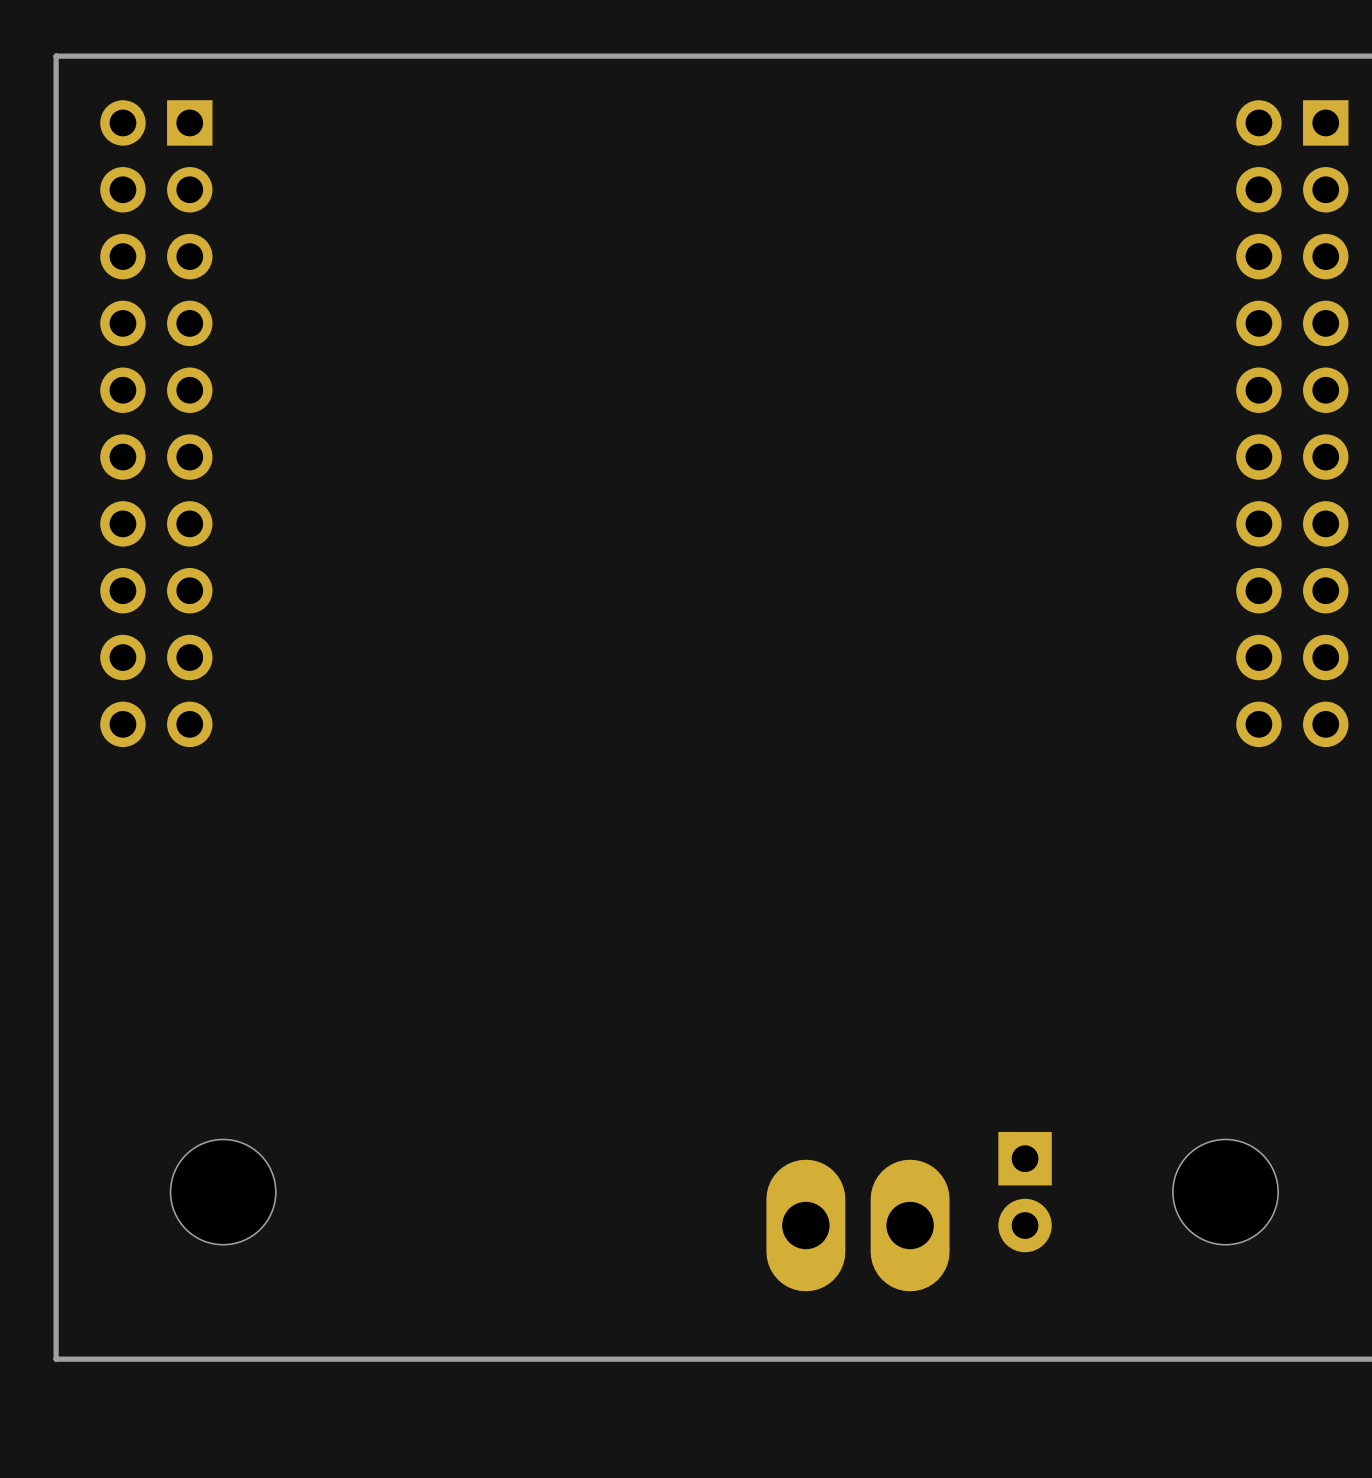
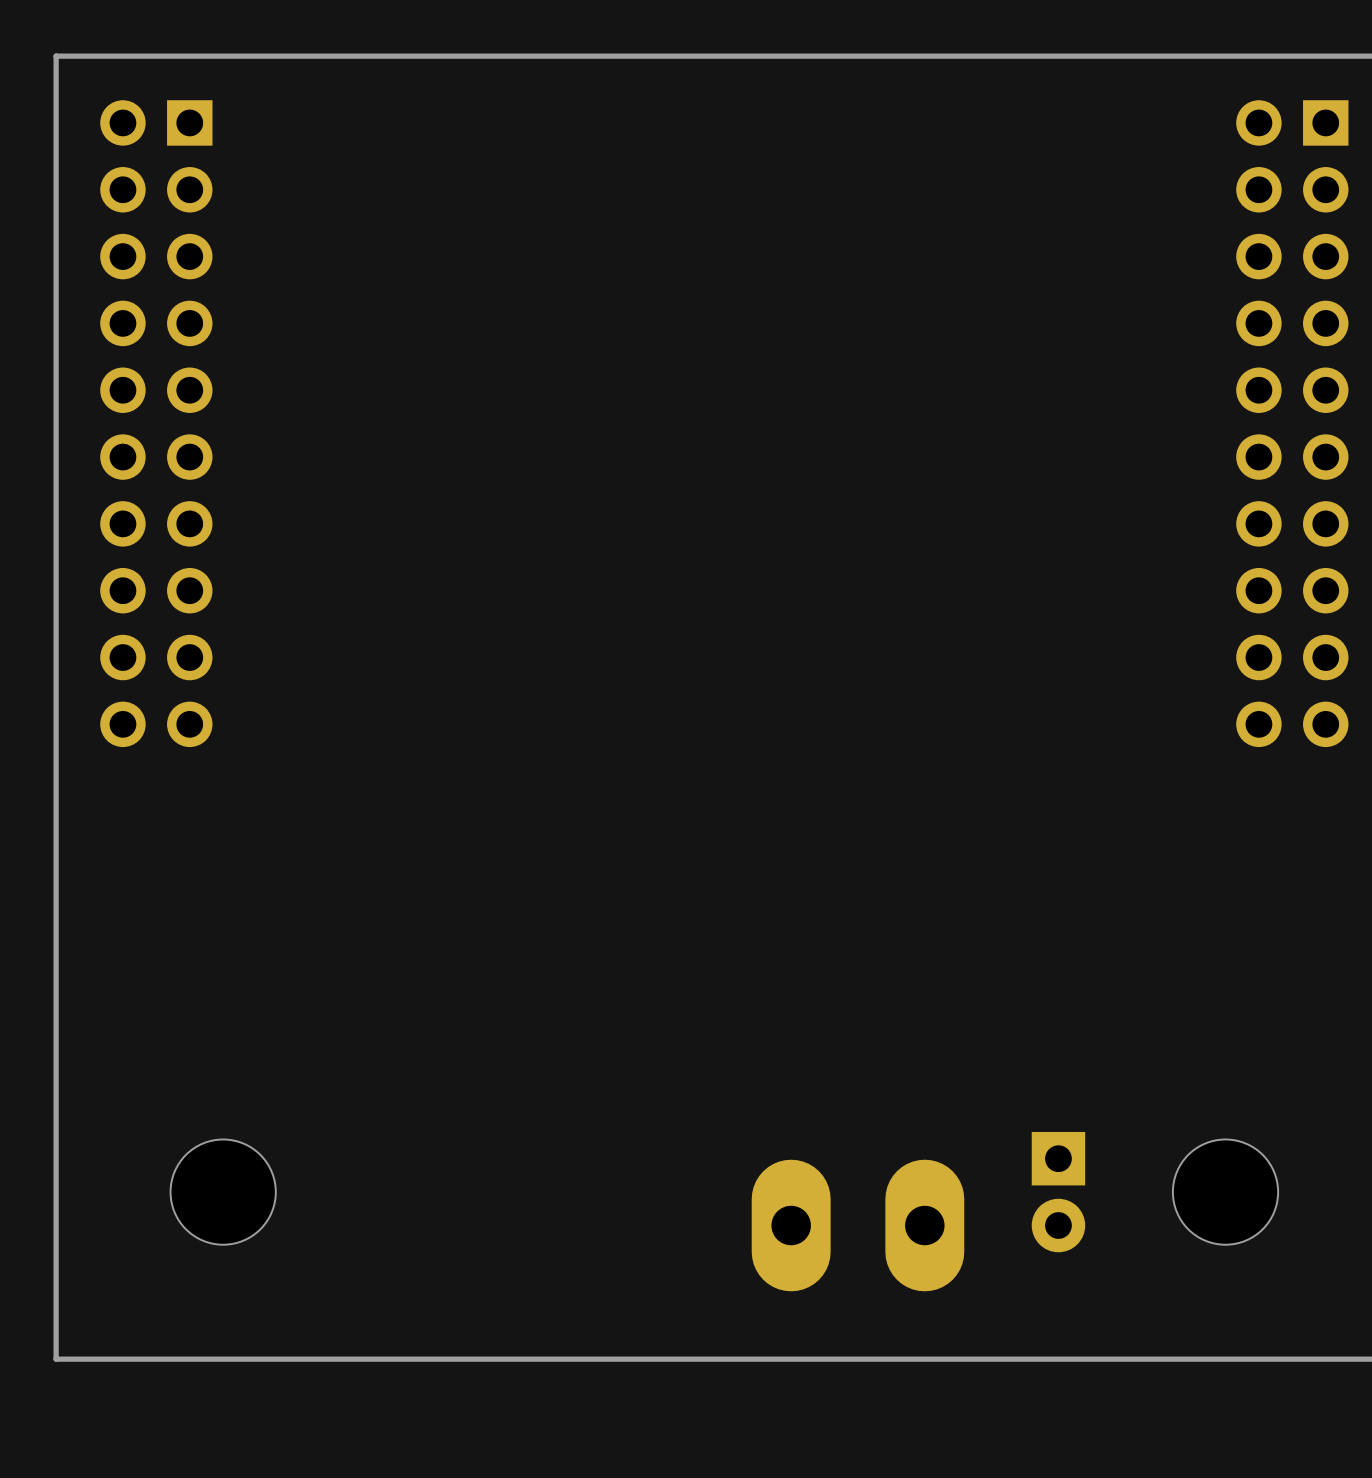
part footprint: [766, 1159, 950, 1292] -> [751, 1159, 965, 1292]
part position: (1025, 1192) -> (1058, 1192)

